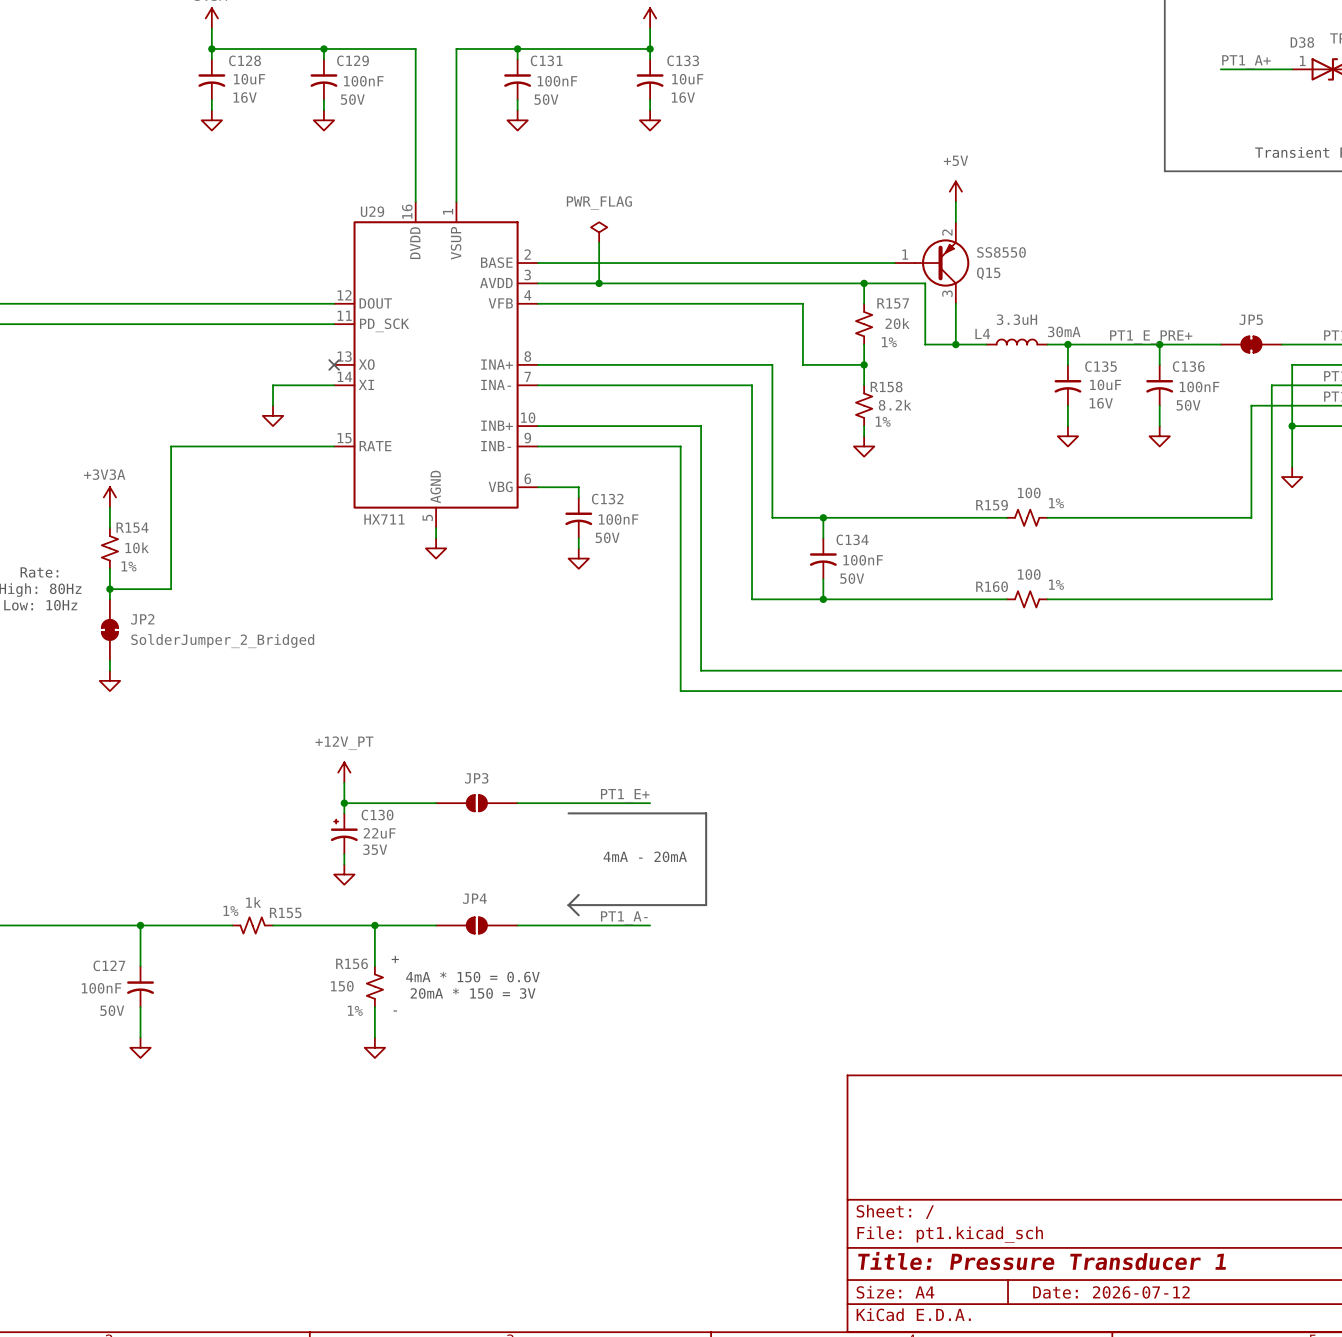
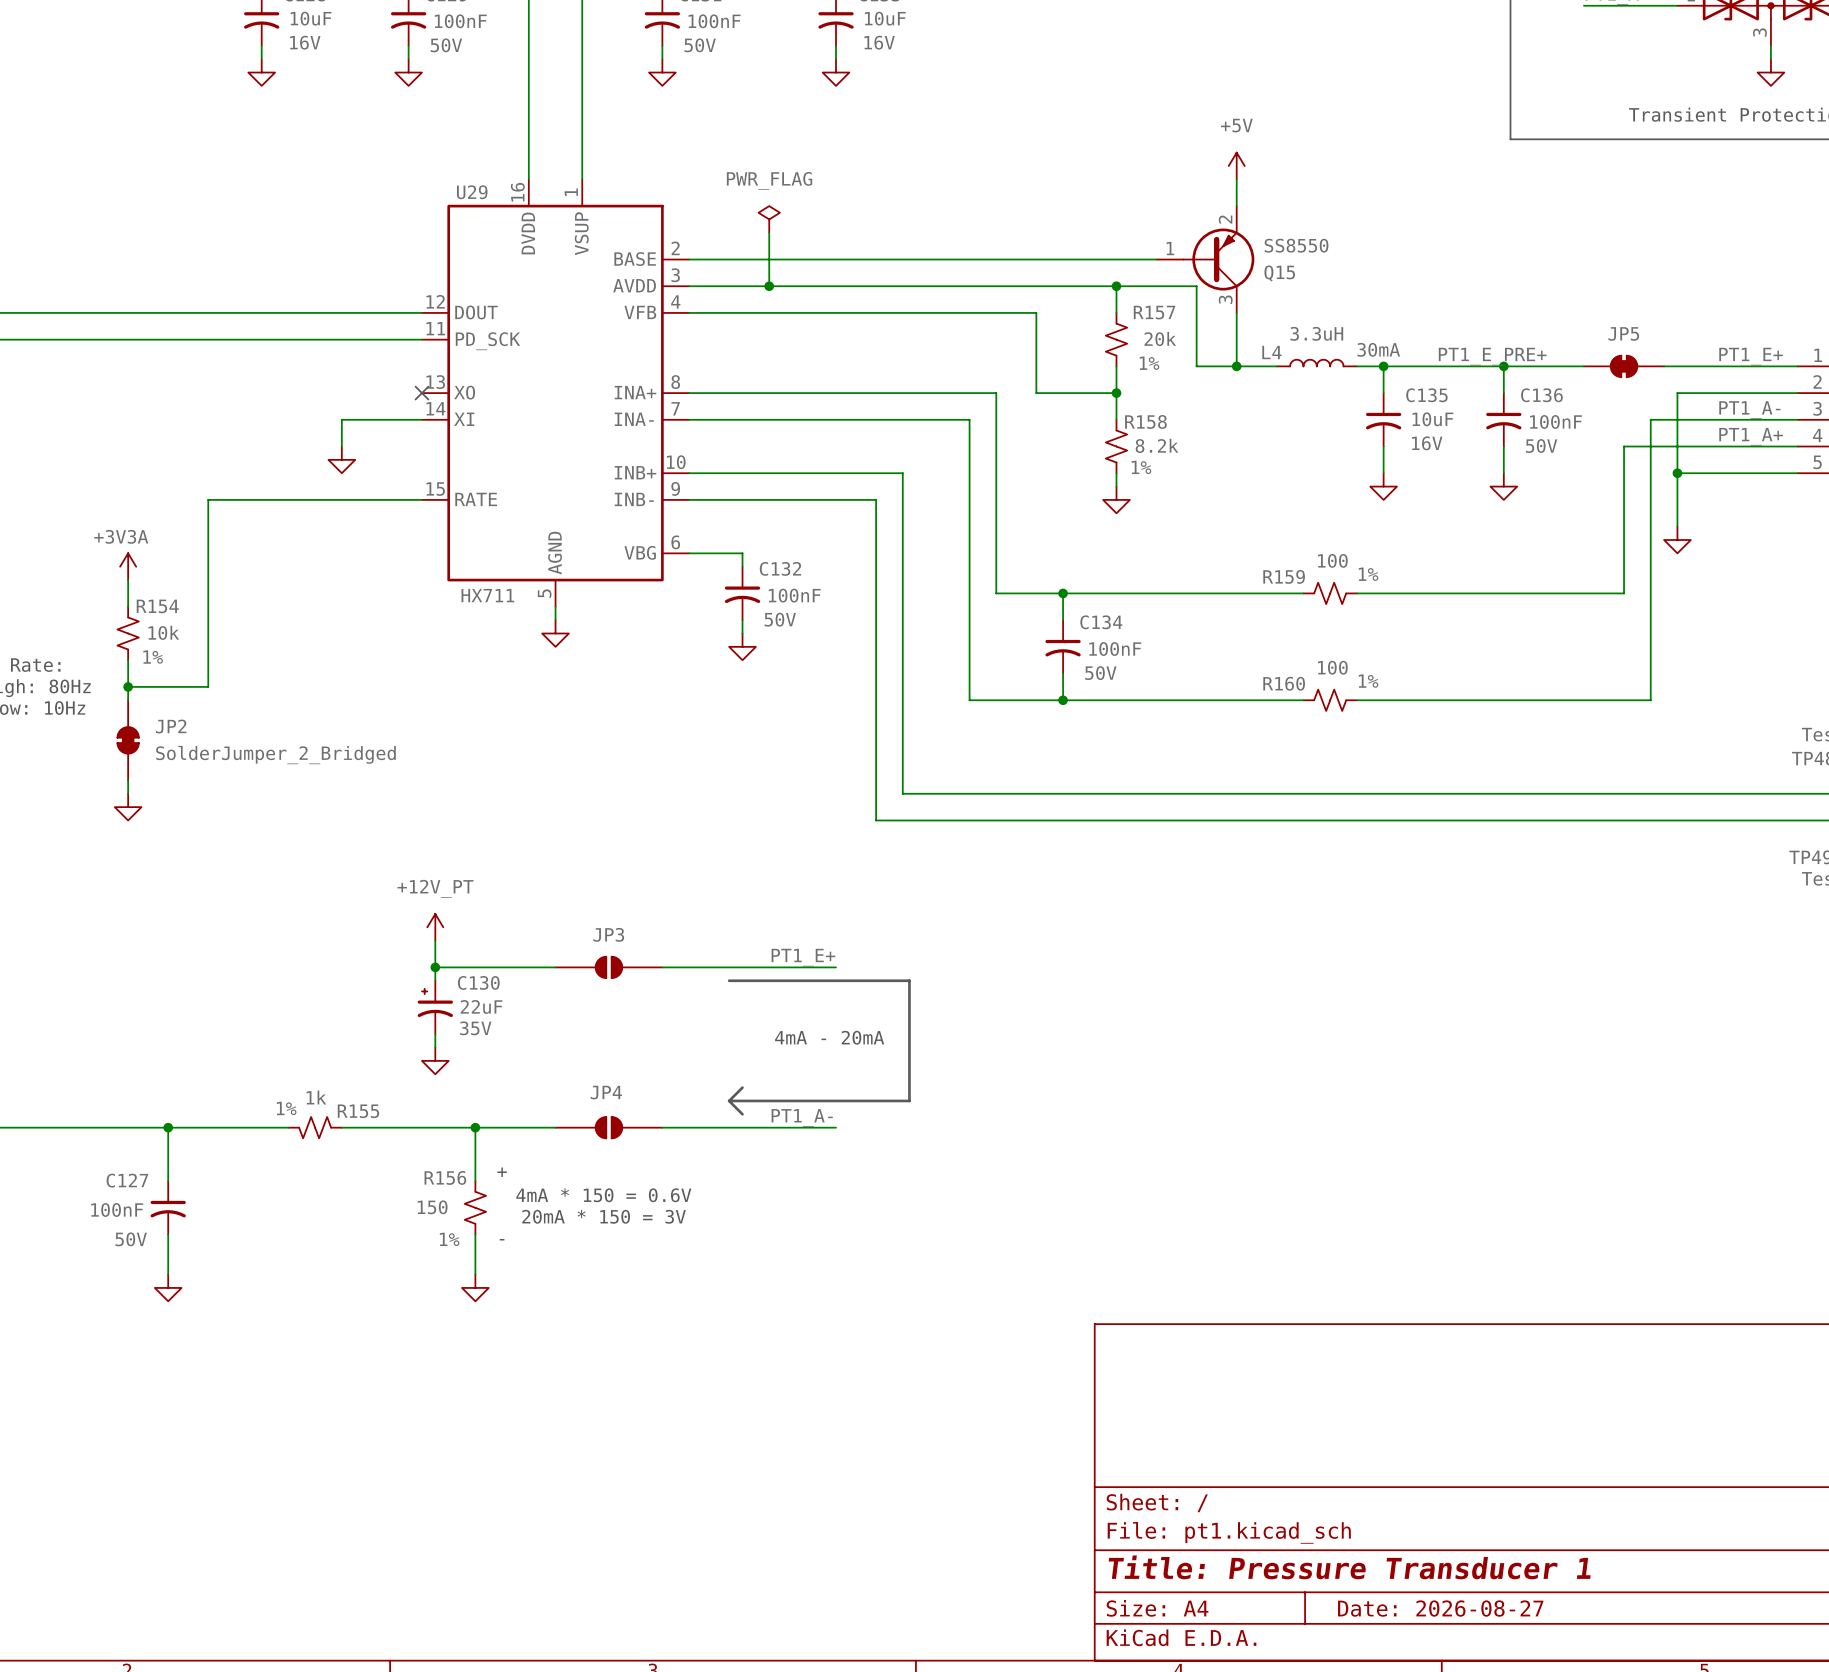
title block: Date: 2026-07-12 (1111, 1292) -> Date: 2026-08-27 (1440, 1608)

